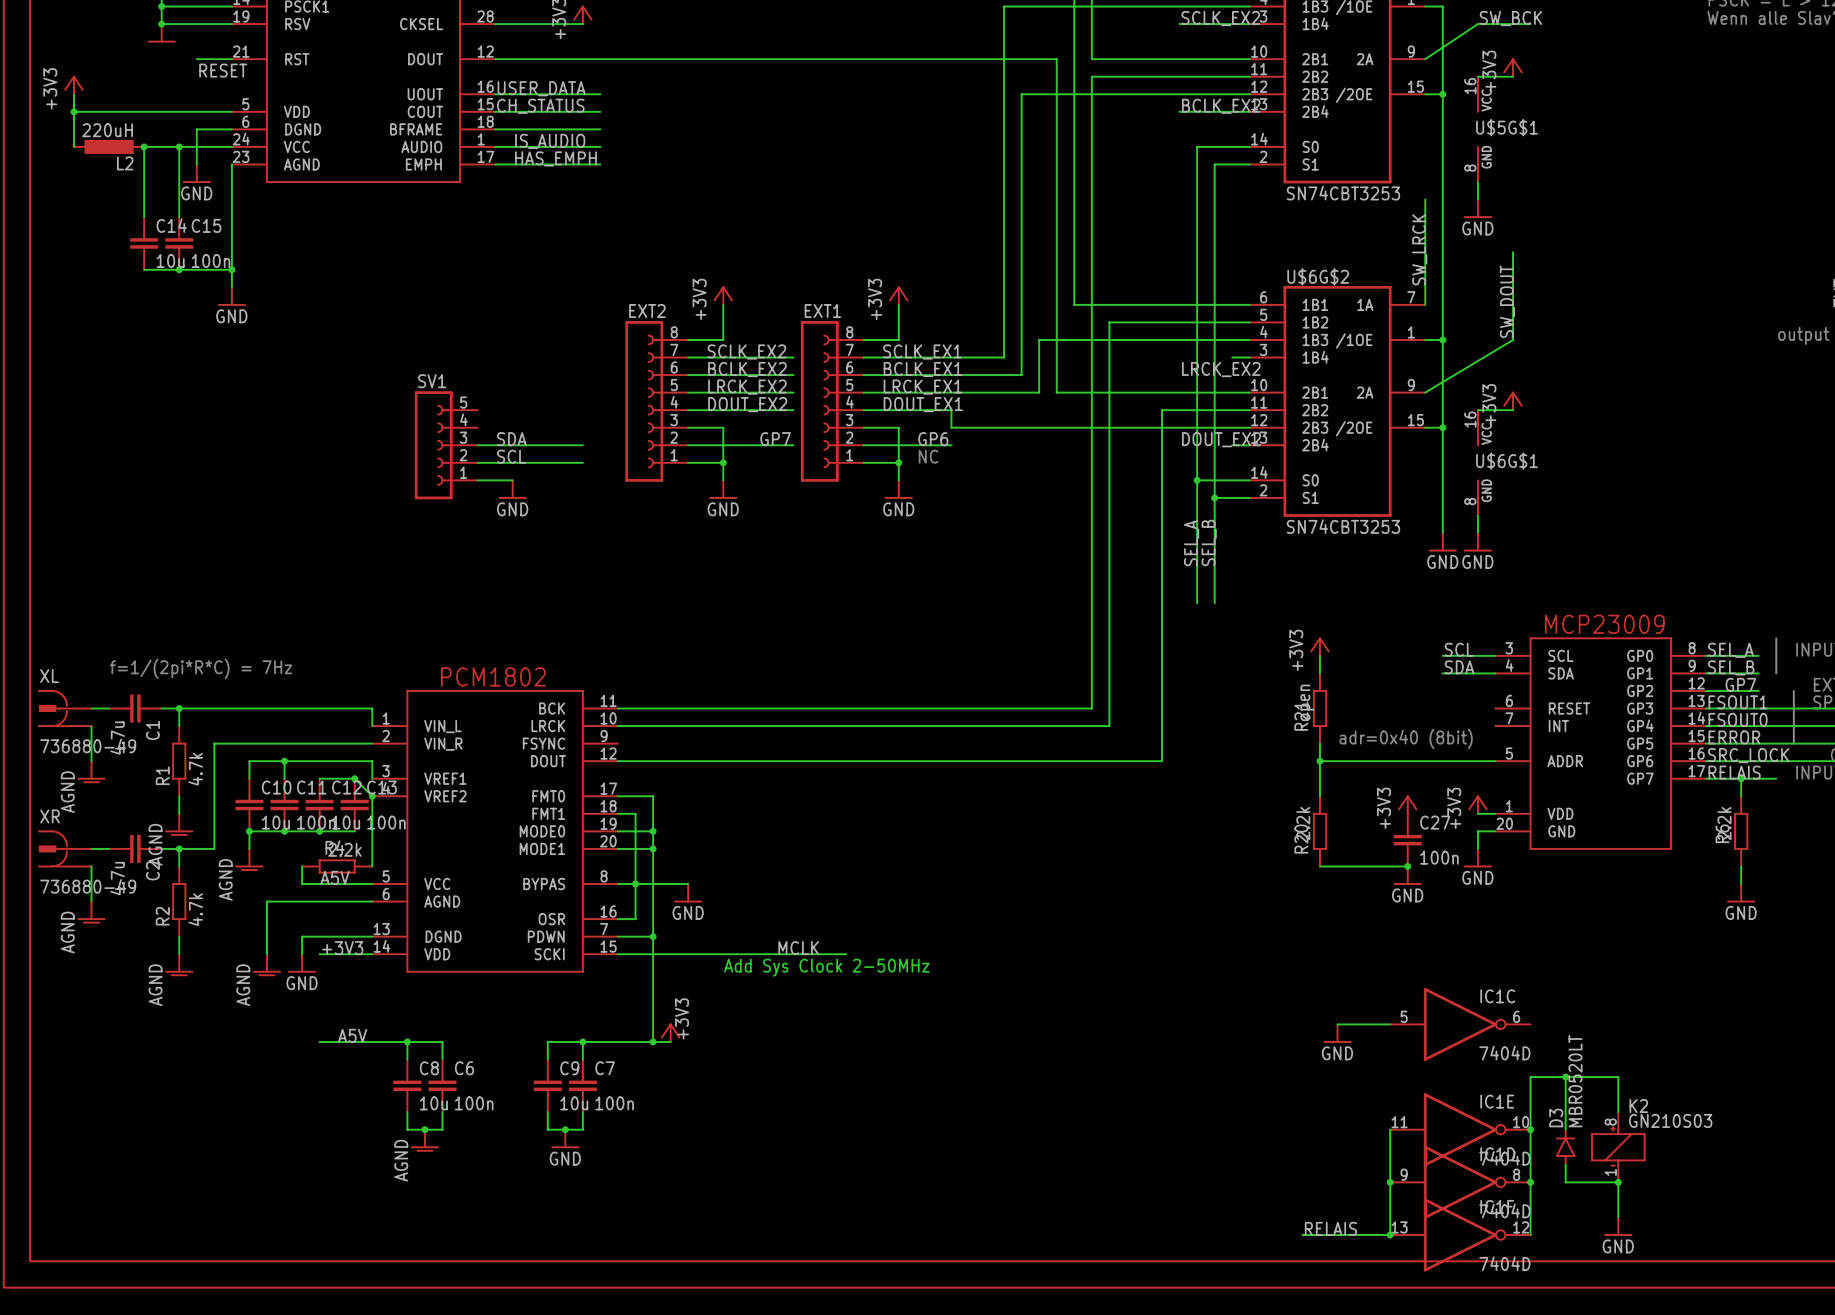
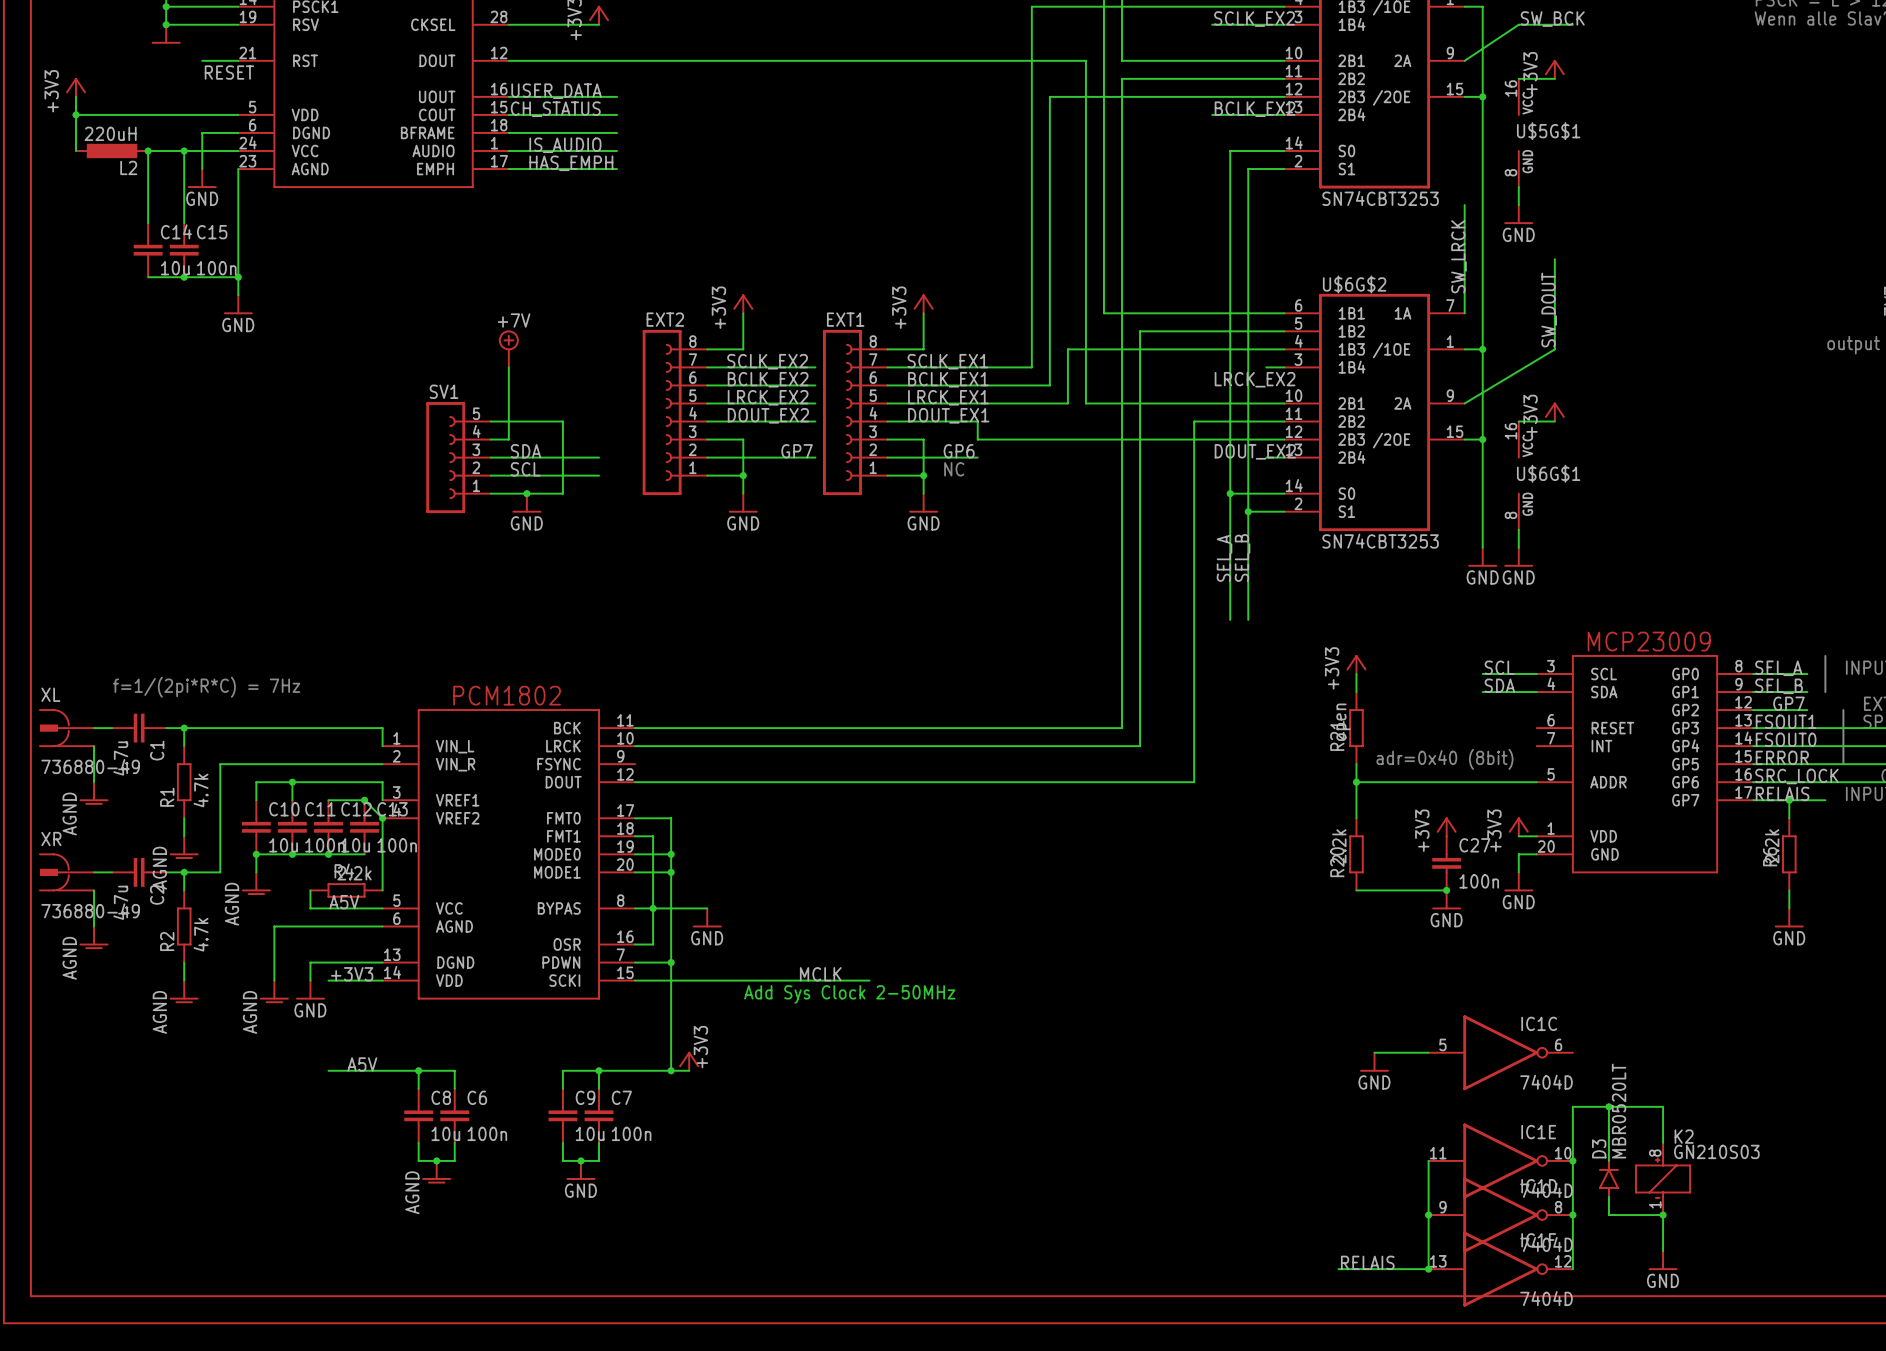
power symbol: none -> +7V (508, 348)
wire: none -> (508, 367) (508, 439) (490, 439)
wire: none -> (490, 421) (562, 421) (562, 493) (526, 493)
junction: none -> (526, 493)

